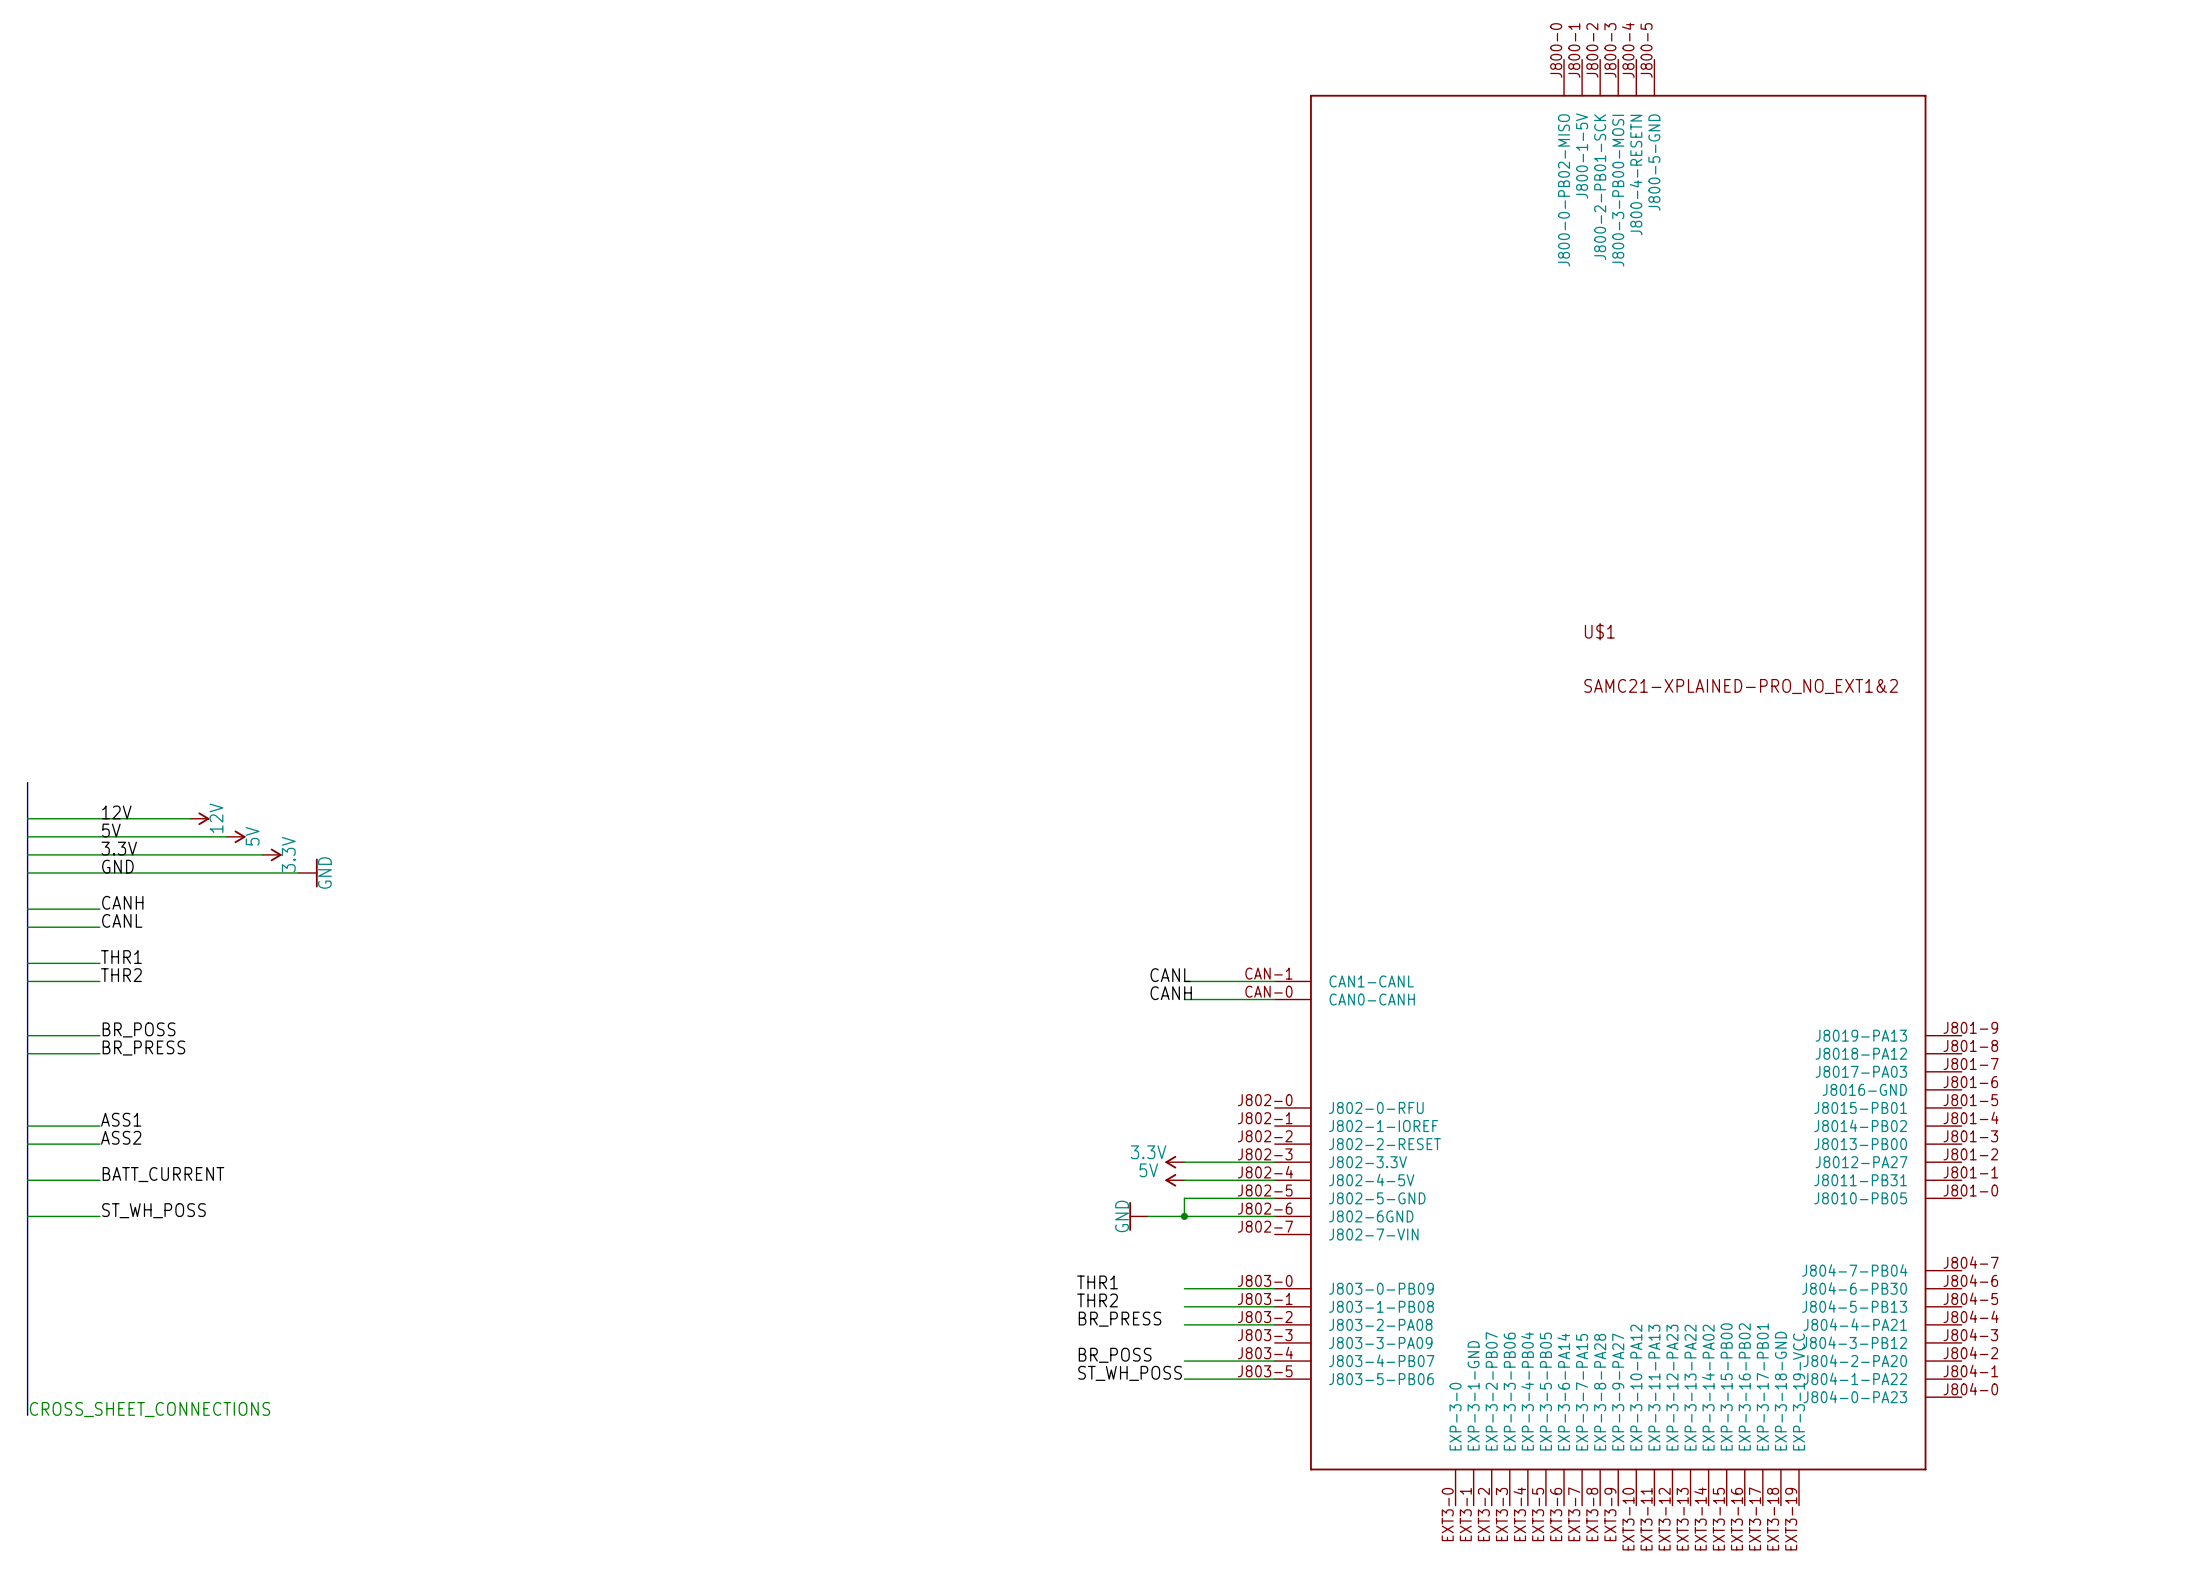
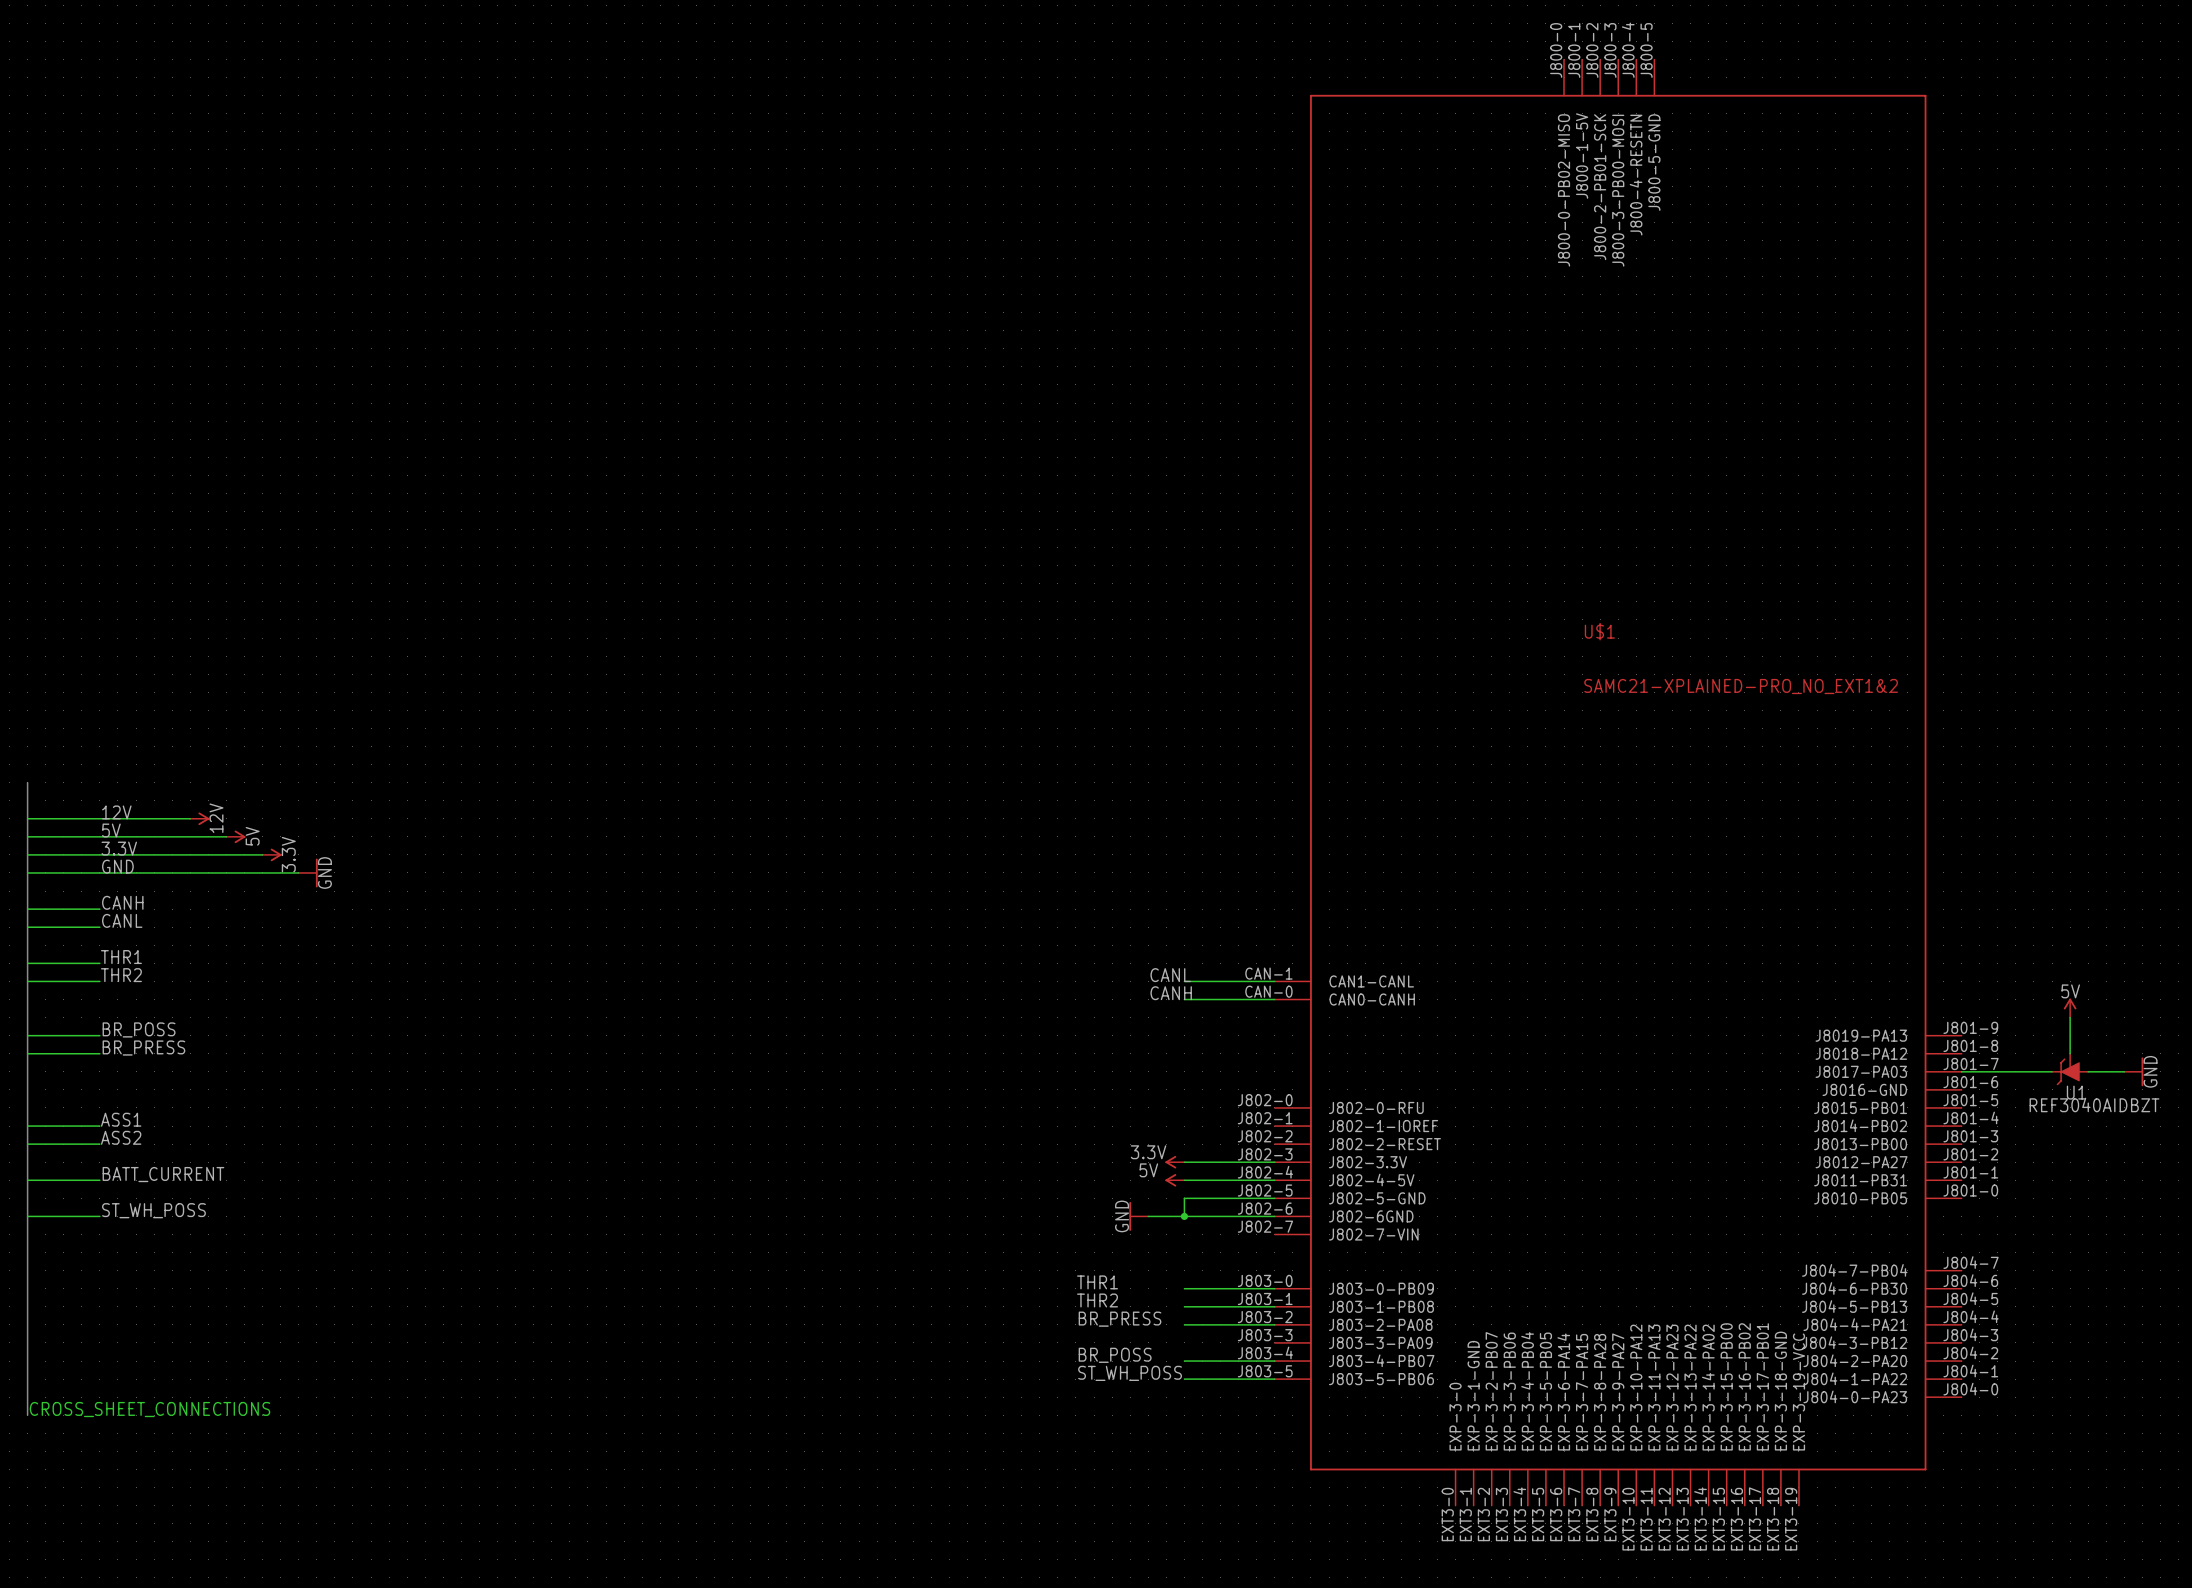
power symbol: none -> 5V (2070, 1008)
wire: none -> (2070, 1017) (2070, 1053)
U1: none -> REF3040AIDBZT (2070, 1069)
wire: none -> (1961, 1071) (2052, 1071)
wire: none -> (2088, 1071) (2124, 1071)
power symbol: none -> GND (2133, 1071)

